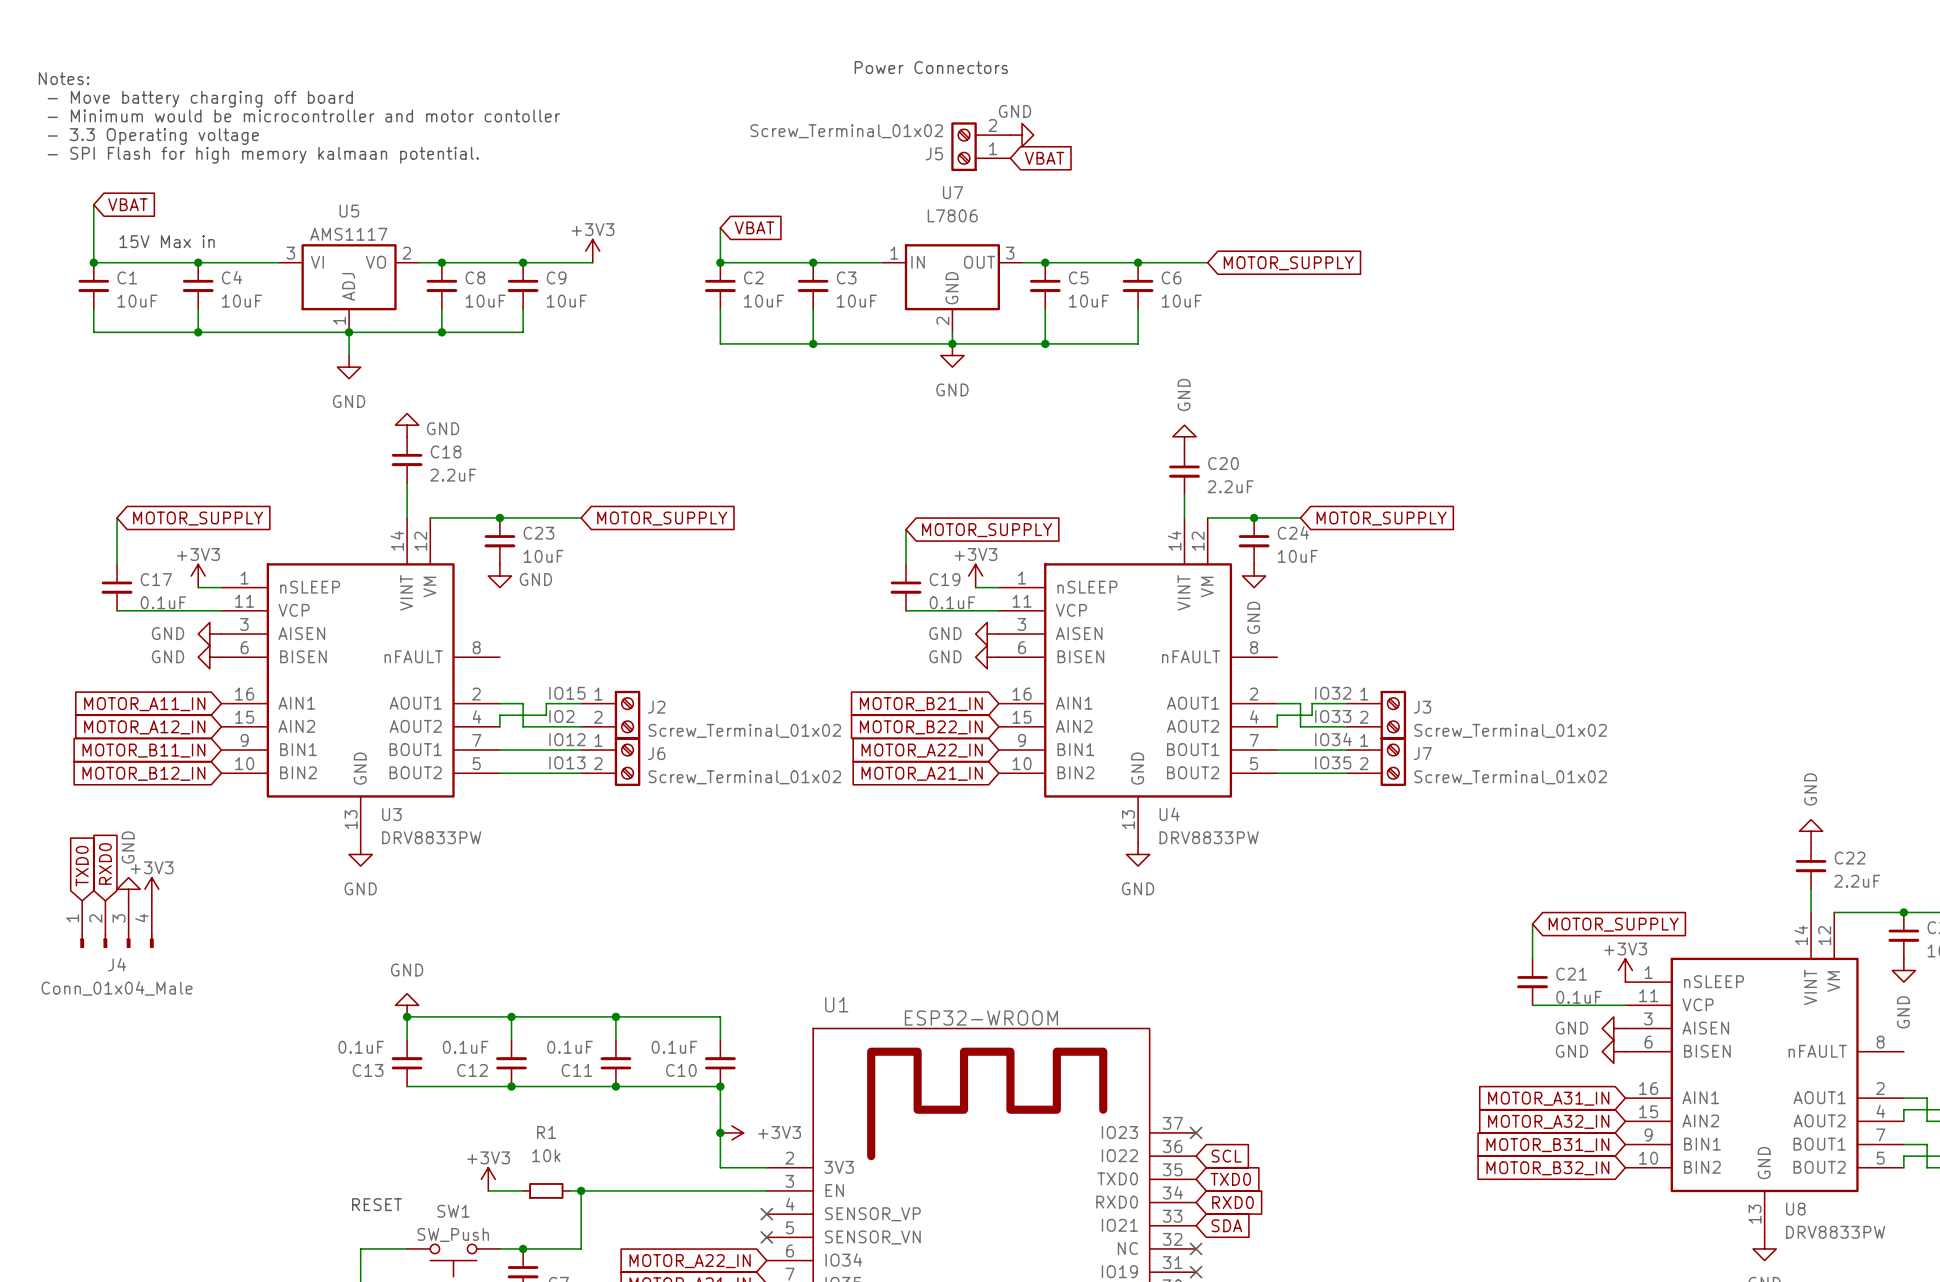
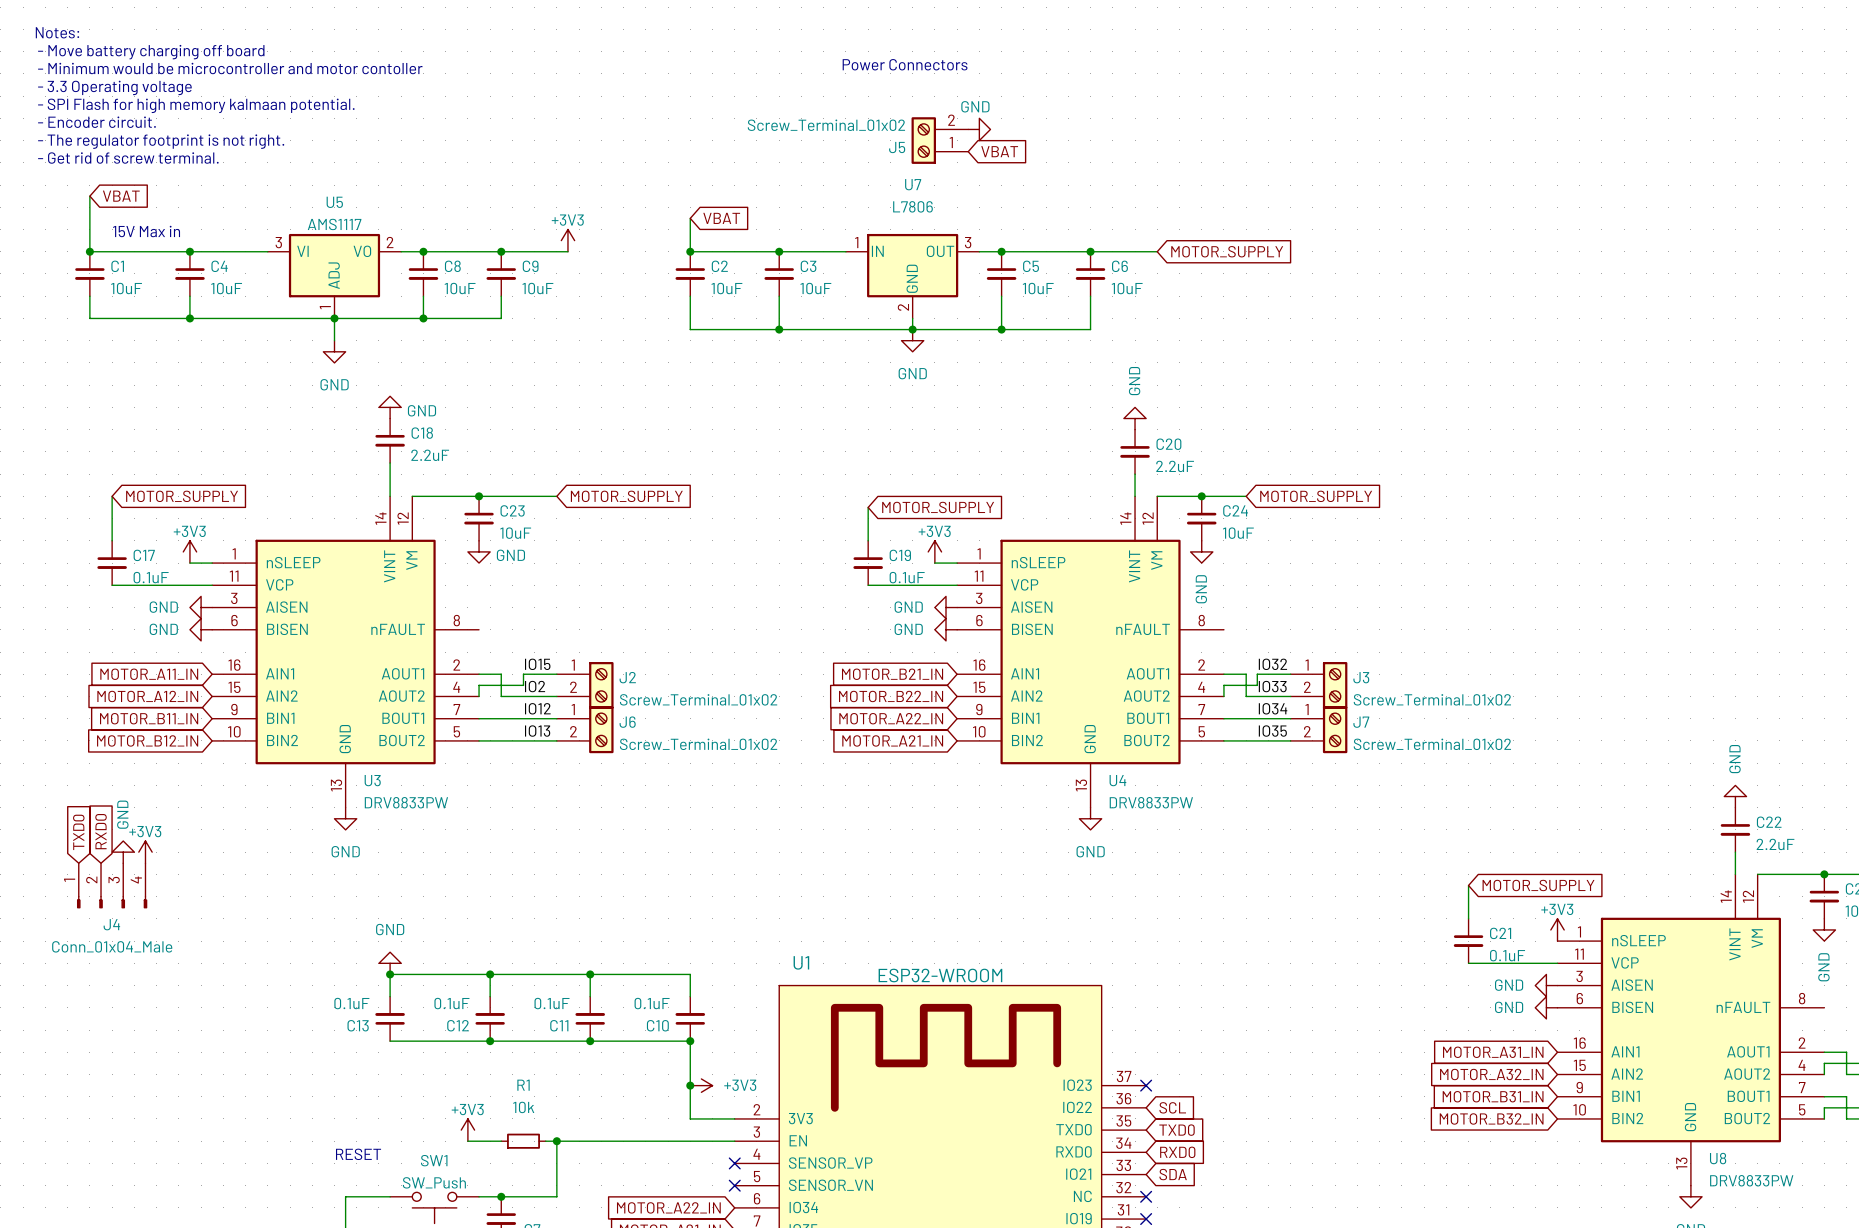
text position: Notes: (64, 78) -> Notes: (57, 32)
text position: - Move battery charging off board (200, 99) -> - Move battery charging off board (151, 52)
text position: - Minimum would be microcontroller and motor contoller (303, 115) -> - Minimum would be microcontroller and motor contoller (230, 68)
text: none -> - Encoder circuit. (96, 122)
text position: - 3.3 Operating voltage (153, 136) -> - 3.3 Operating voltage (114, 87)
text: none -> - The regulator footprint is not right. (161, 141)
text position: - SPI Flash for high memory kalmaan potential. (263, 155) -> - SPI Flash for high memory kalmaan potential. (196, 105)
text: none -> - Get rid of screw terminal. (128, 158)

